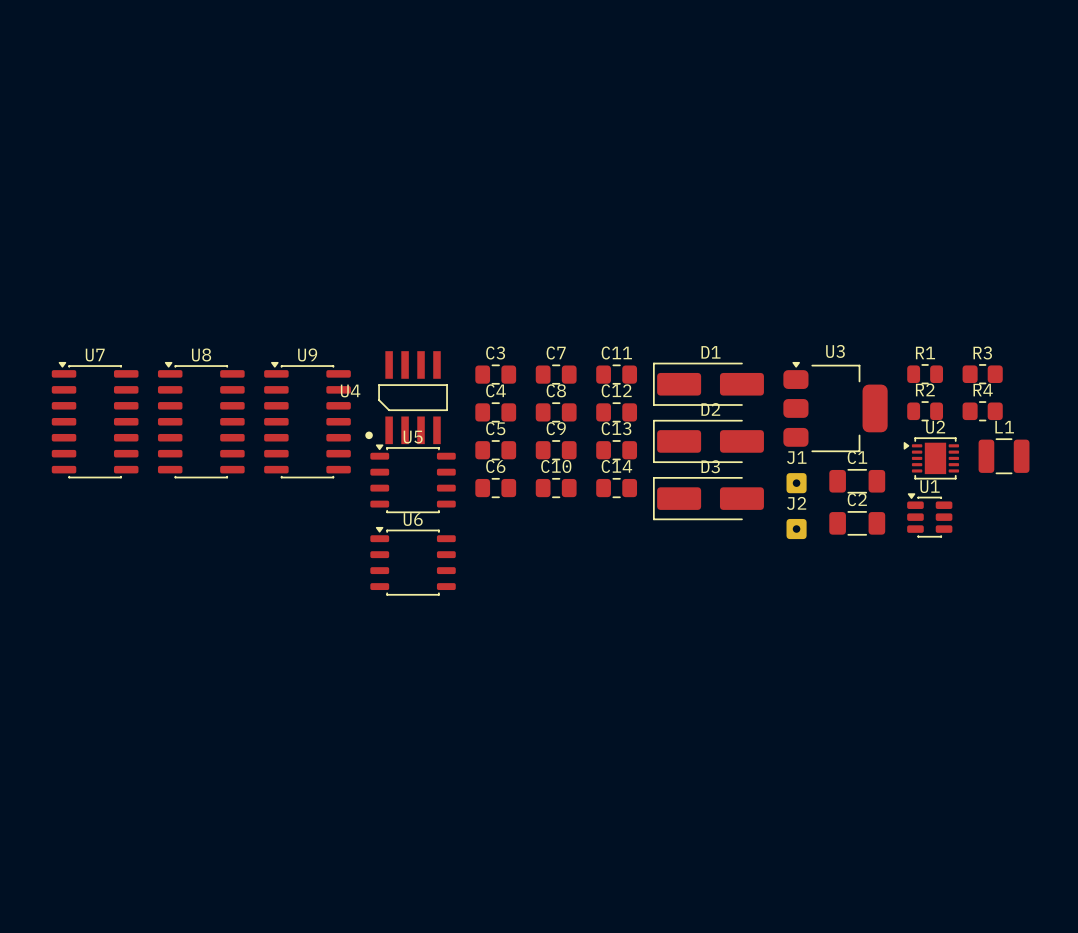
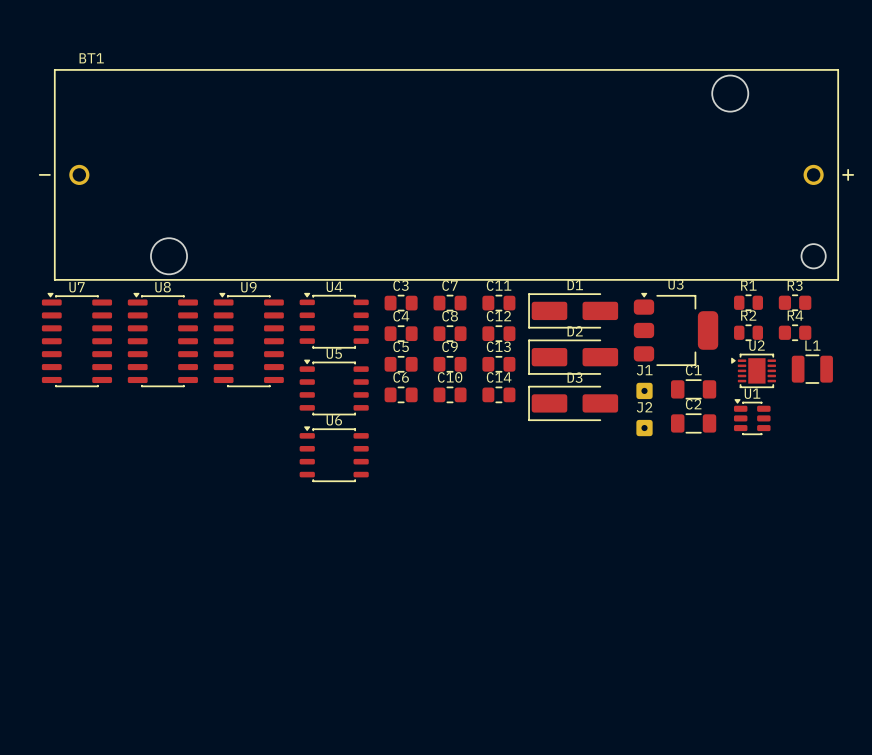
BT1: none -> (446, 174)
U4 footprint: [365, 351, 448, 445] -> [299, 292, 369, 349]
U4 name position: U4 (350, 391) -> U4 (334, 286)

